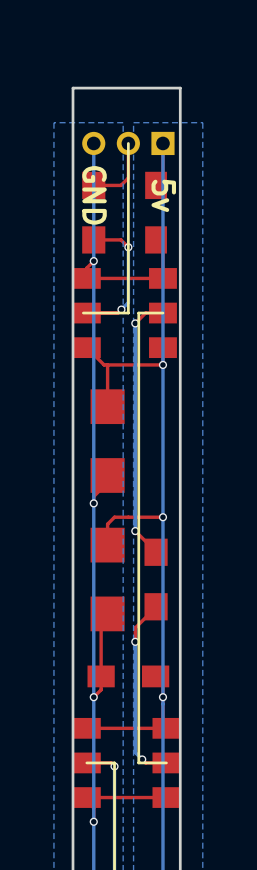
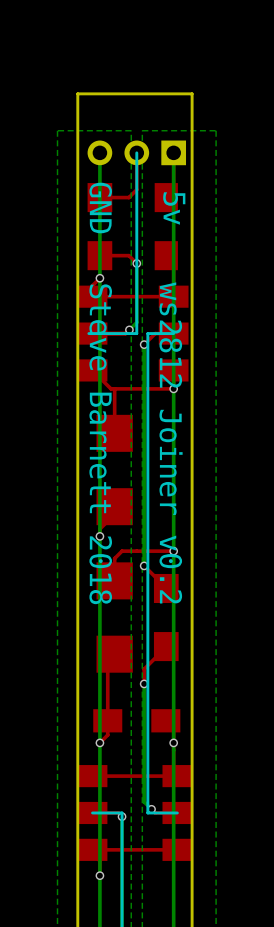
text: none -> Steve Barnett 2018 (100, 444)
text: none -> ws2812 Joiner v0.2 (171, 442)

